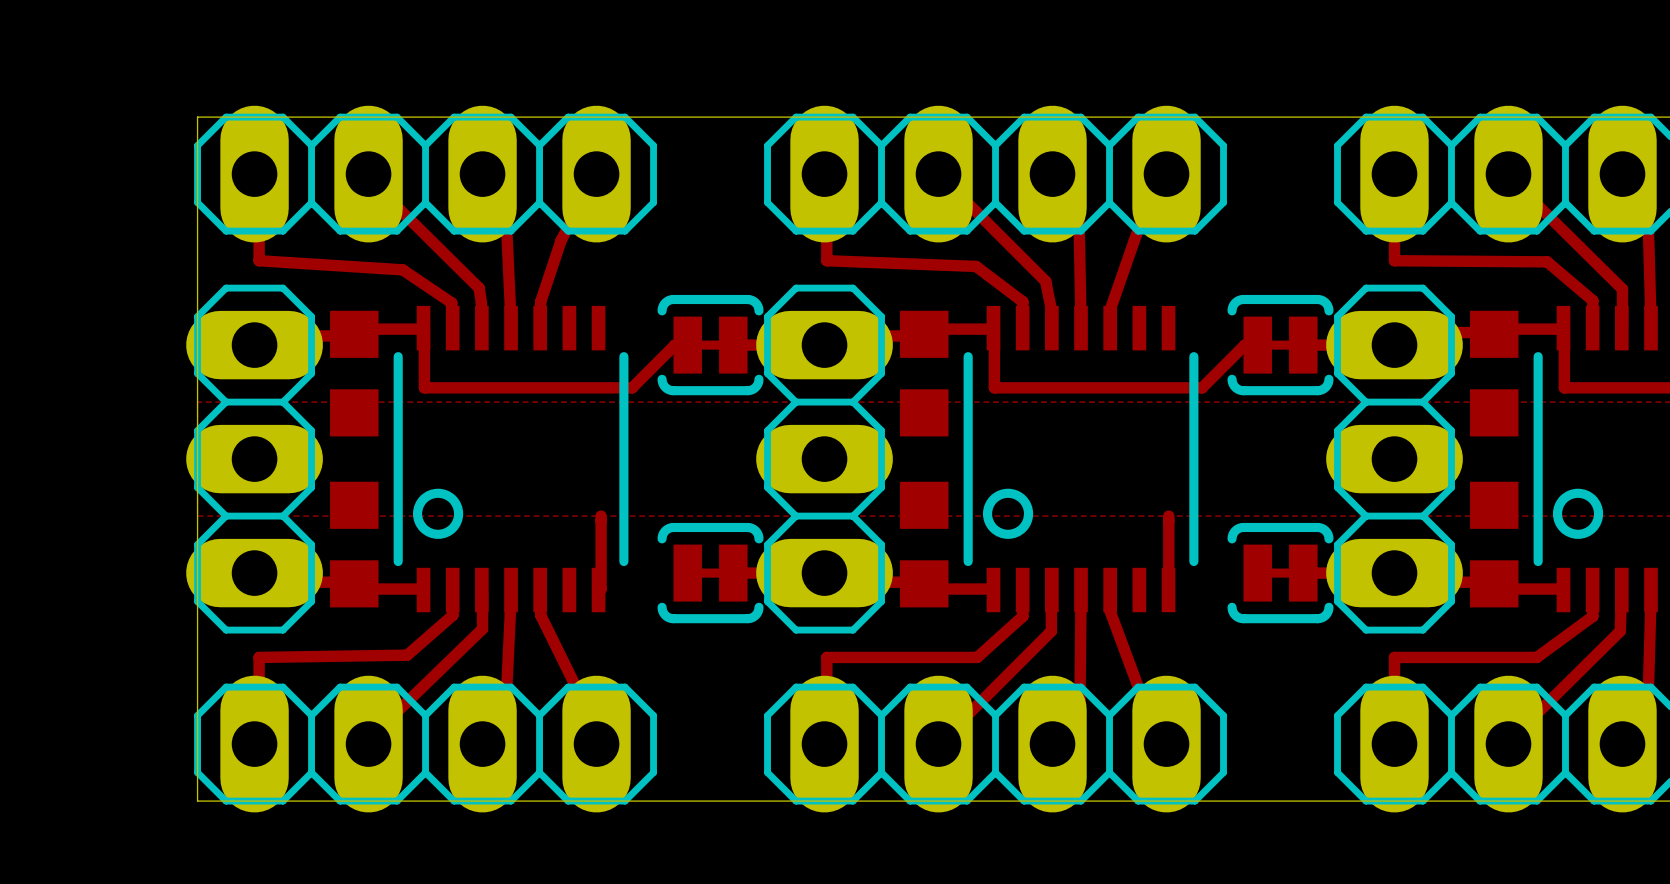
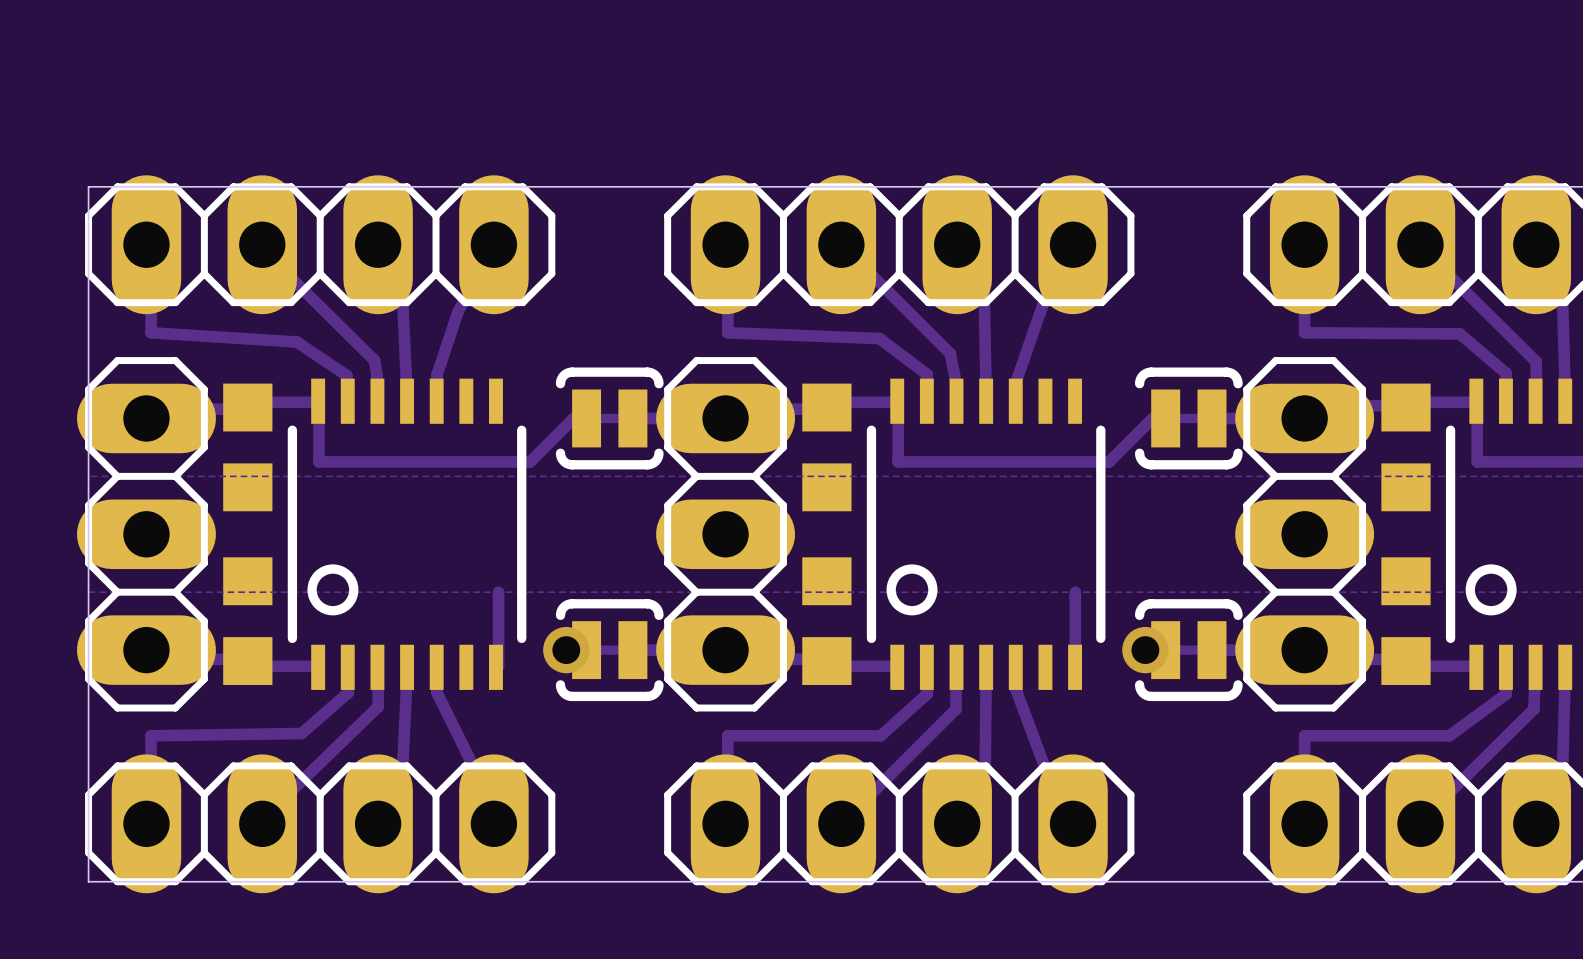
via: none -> (566, 650)
via: none -> (1145, 650)

